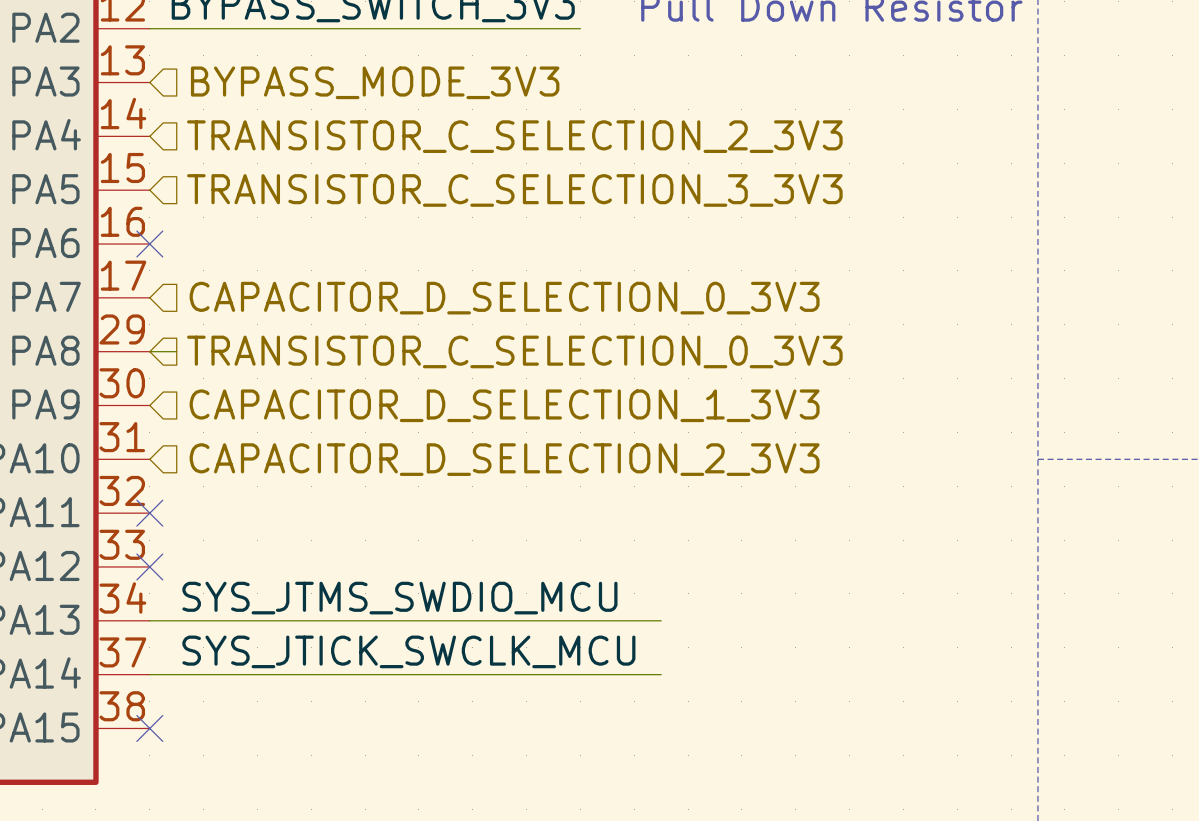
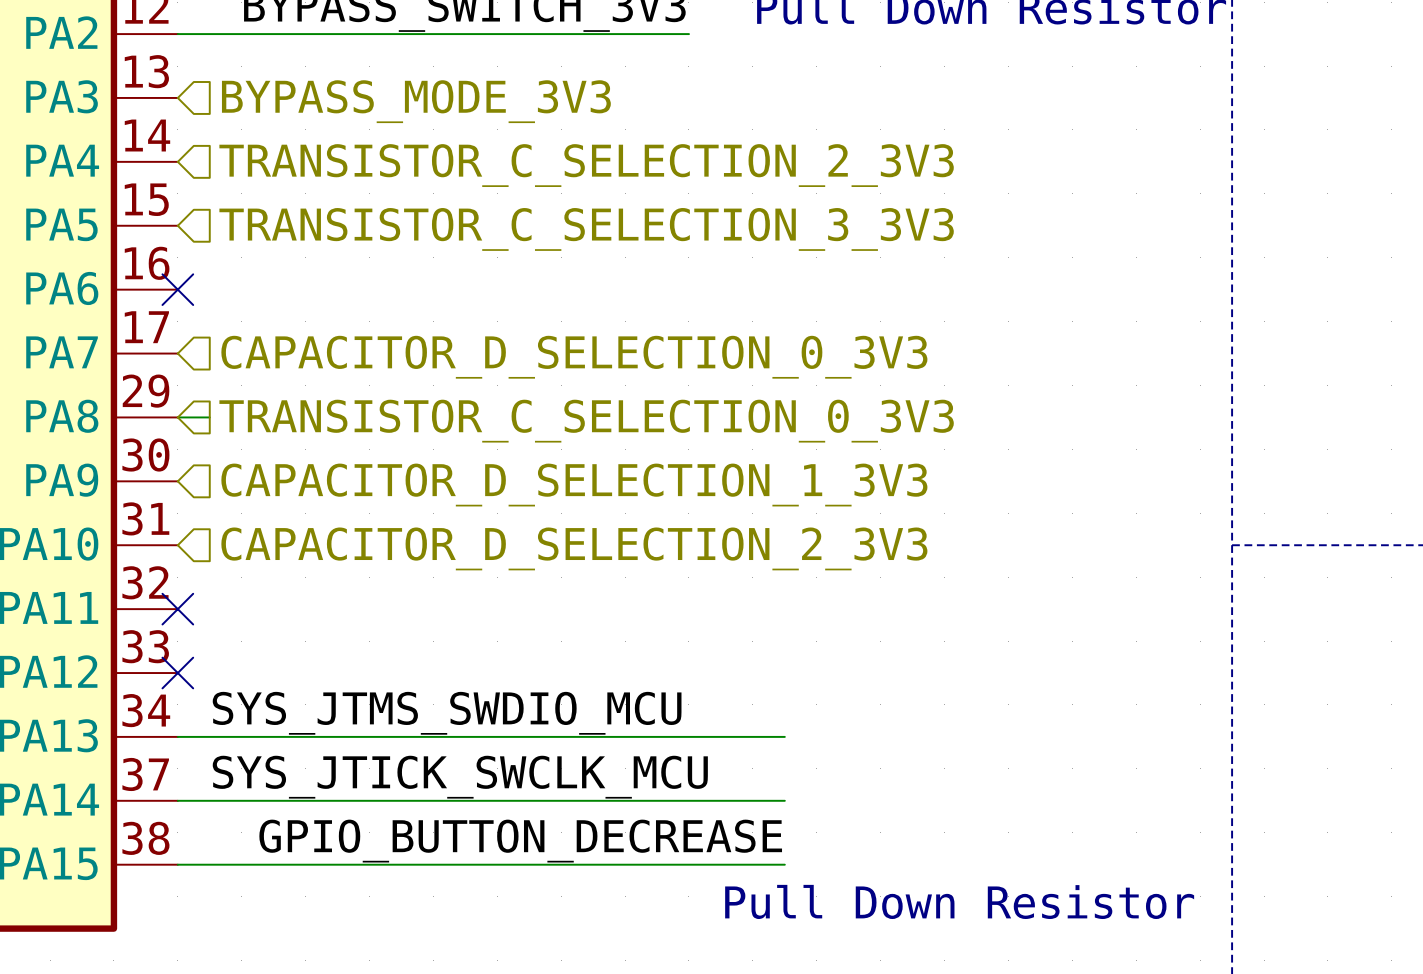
label: none -> GPIO_BUTTON_DECREASE (520, 841)
wire: none -> (177, 864) (784, 864)
no-connect mark: (149, 728) -> none
text: none -> Pull Down Resistor (959, 901)

